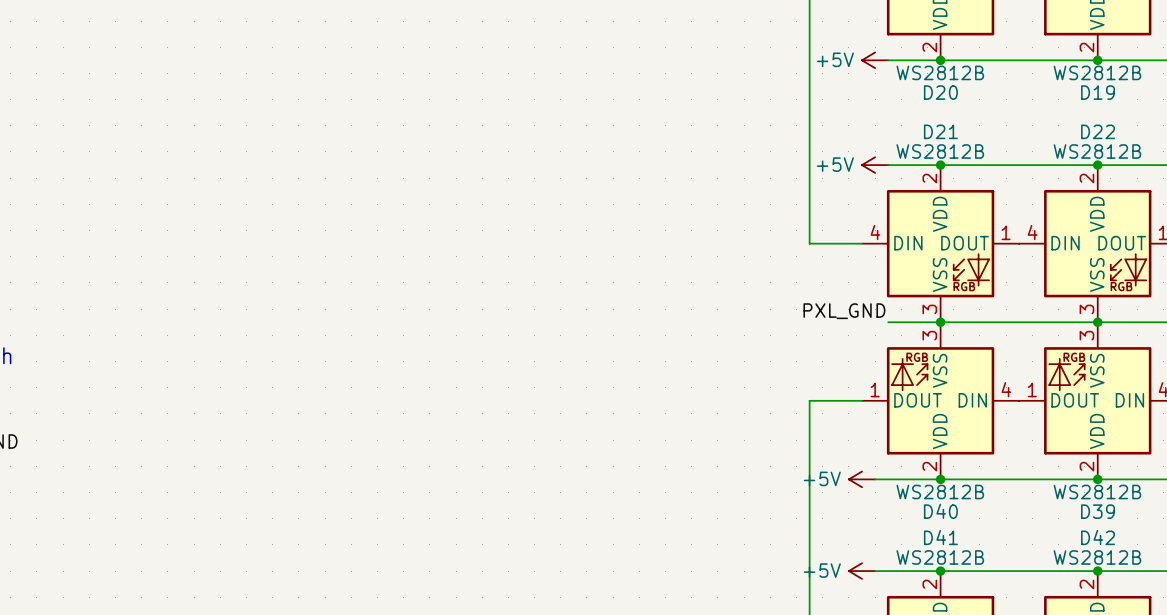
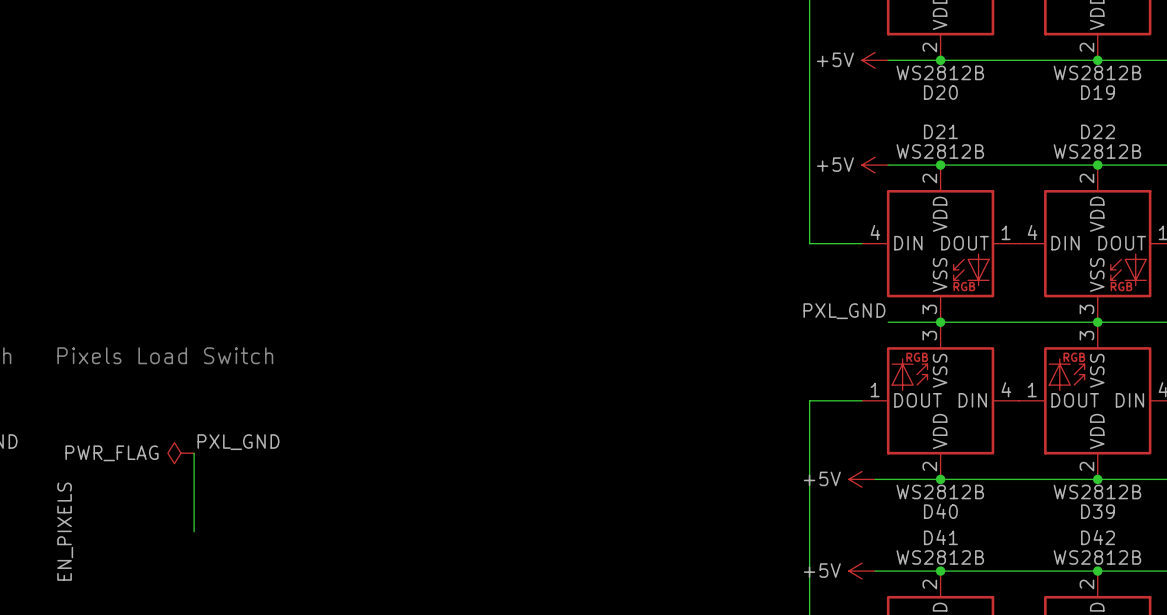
text: none -> Pixels Load Switch (165, 355)
label: none -> PXL_GND (238, 442)
power symbol: none -> PWR_FLAG (181, 453)
wire: none -> (194, 453) (194, 531)
label: none -> EN_PIXELS (65, 531)

